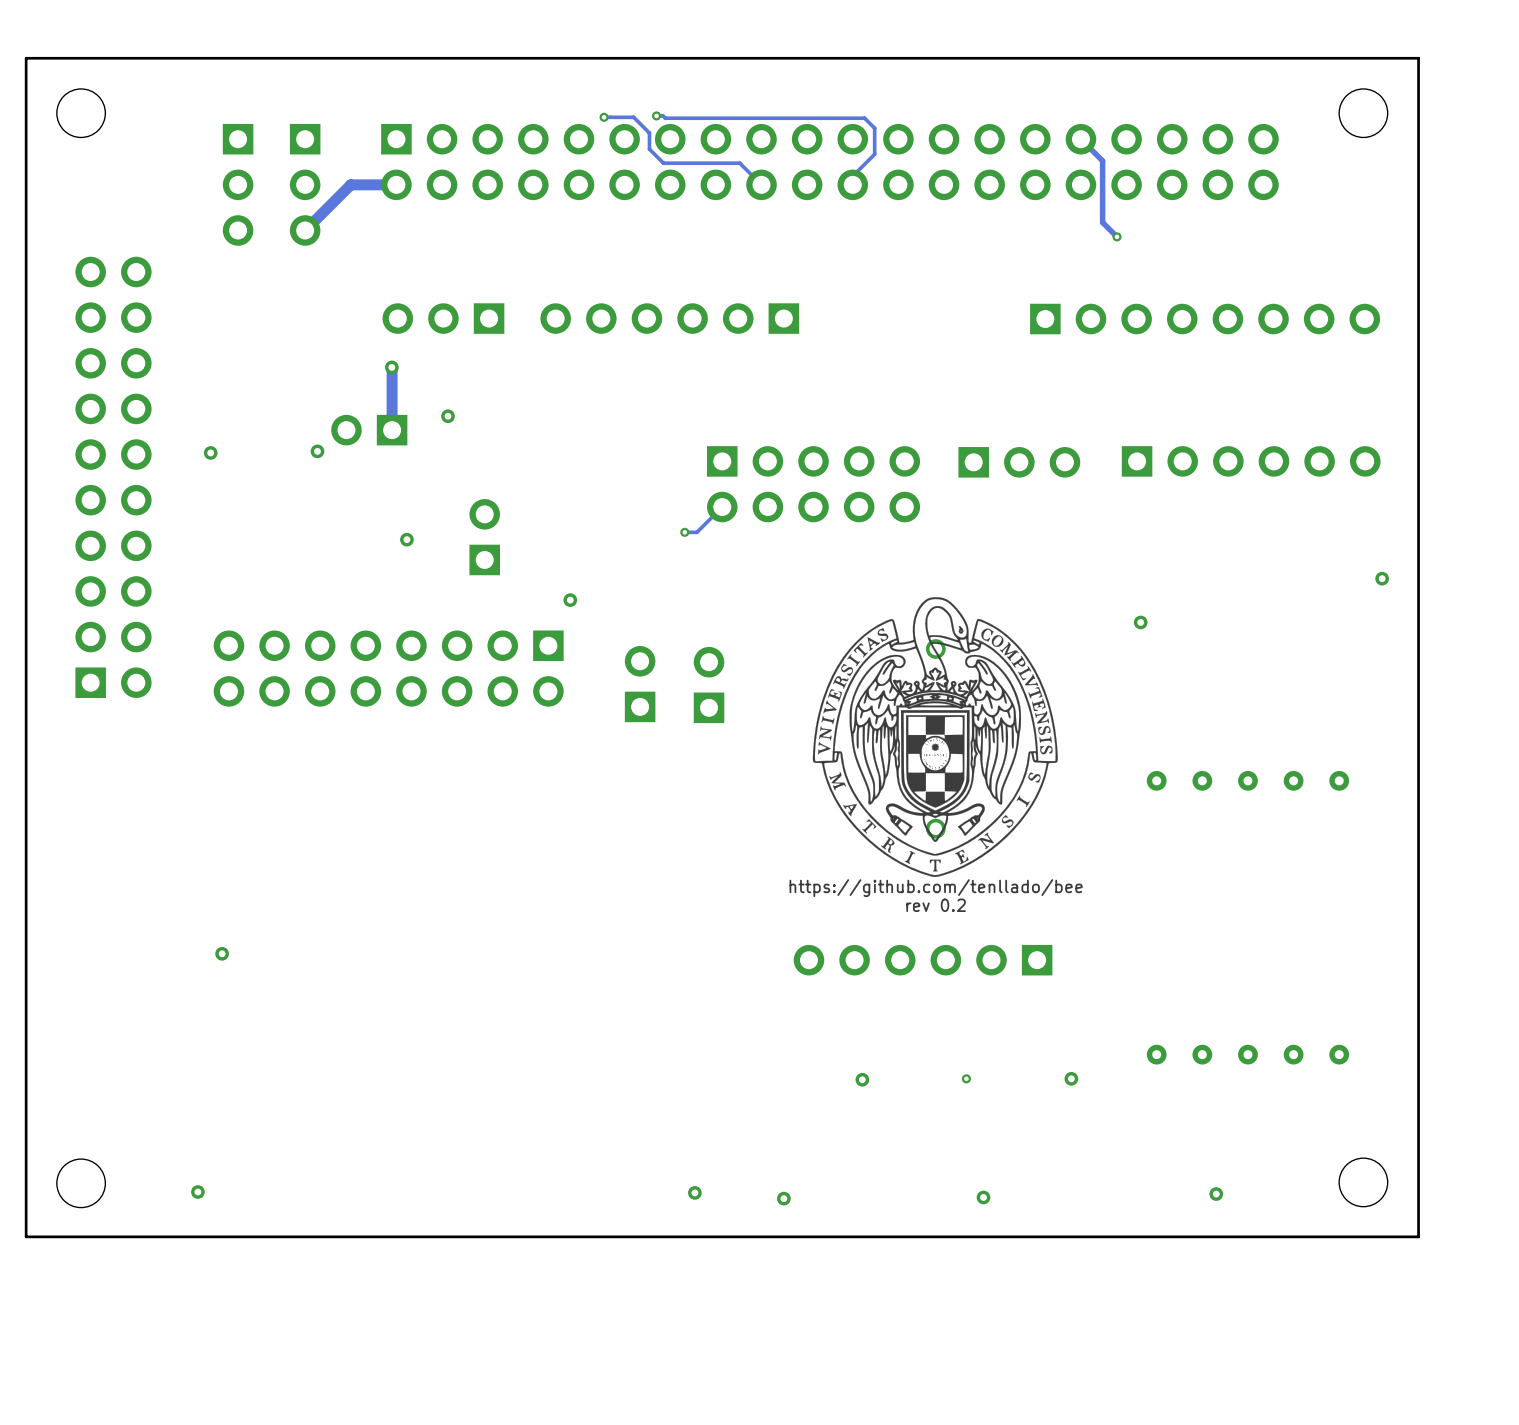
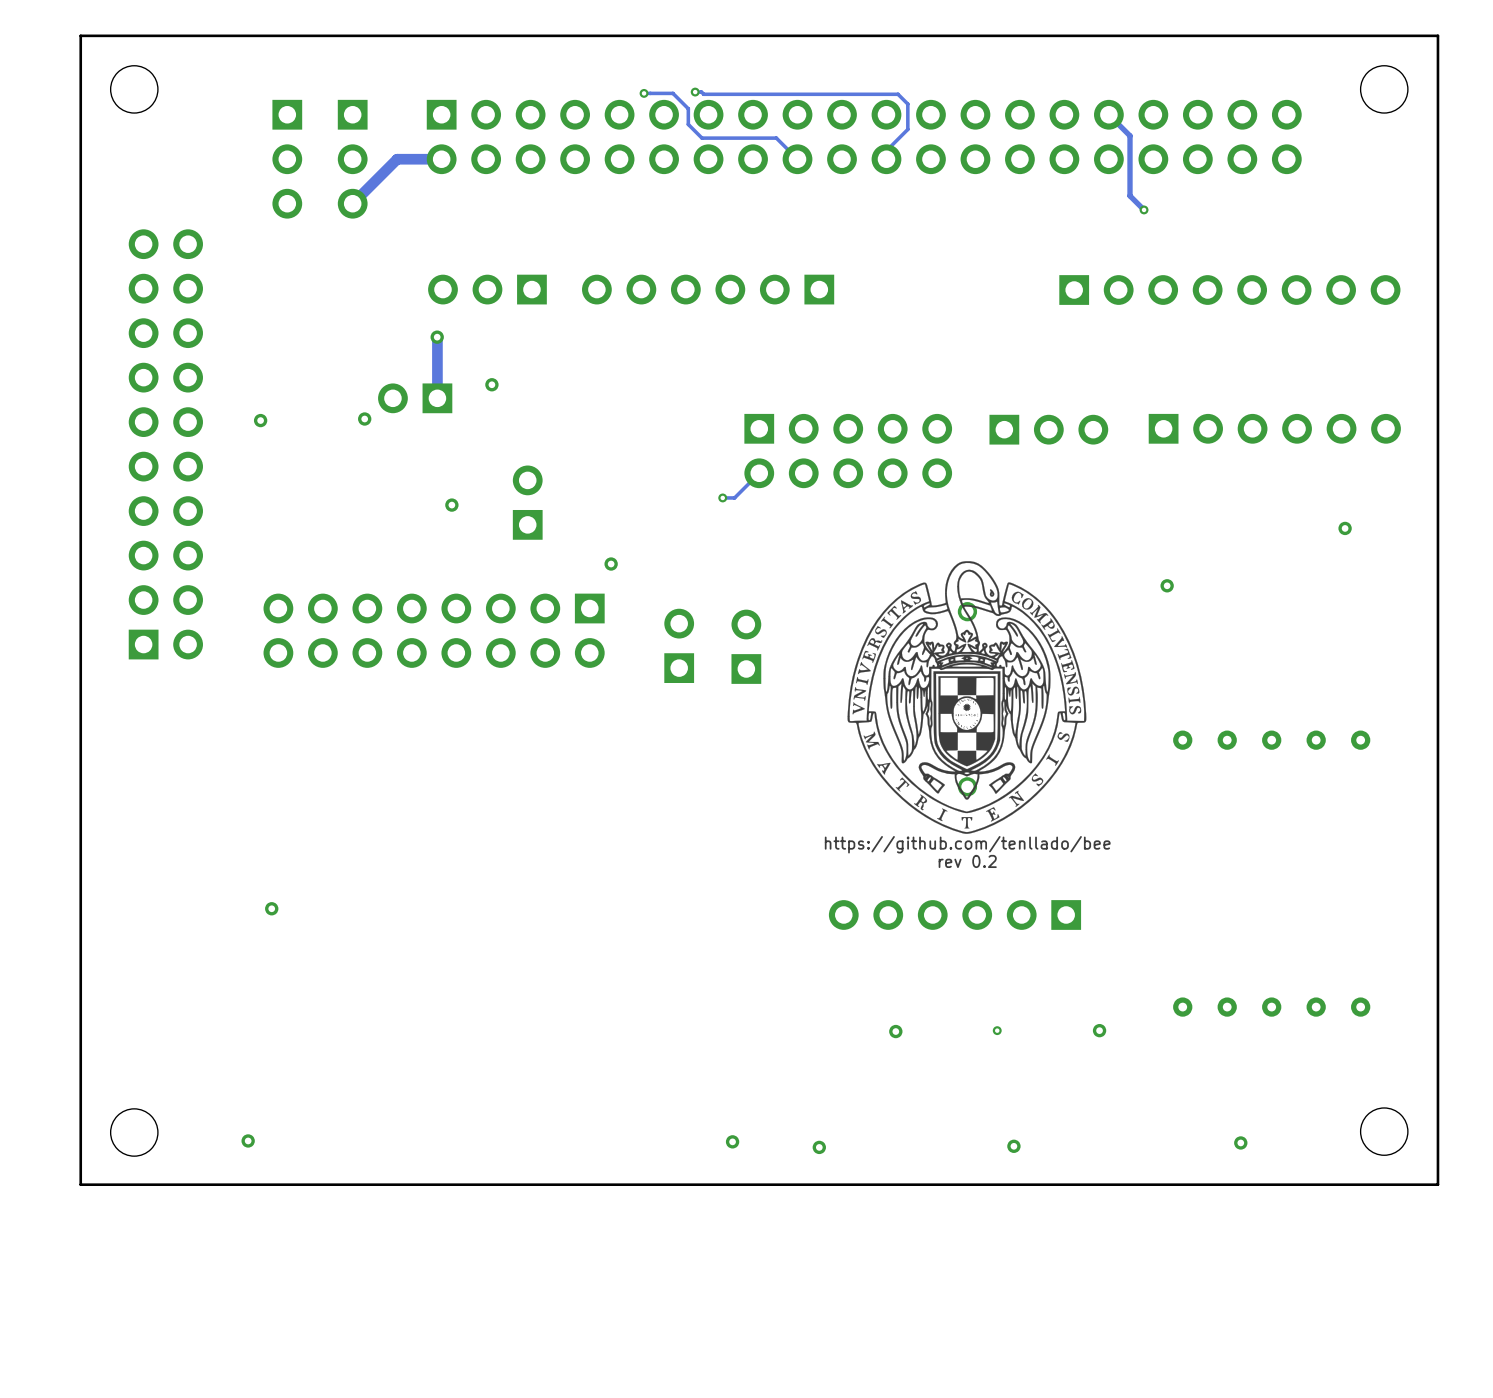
via position: (1382, 578) -> (1345, 528)

